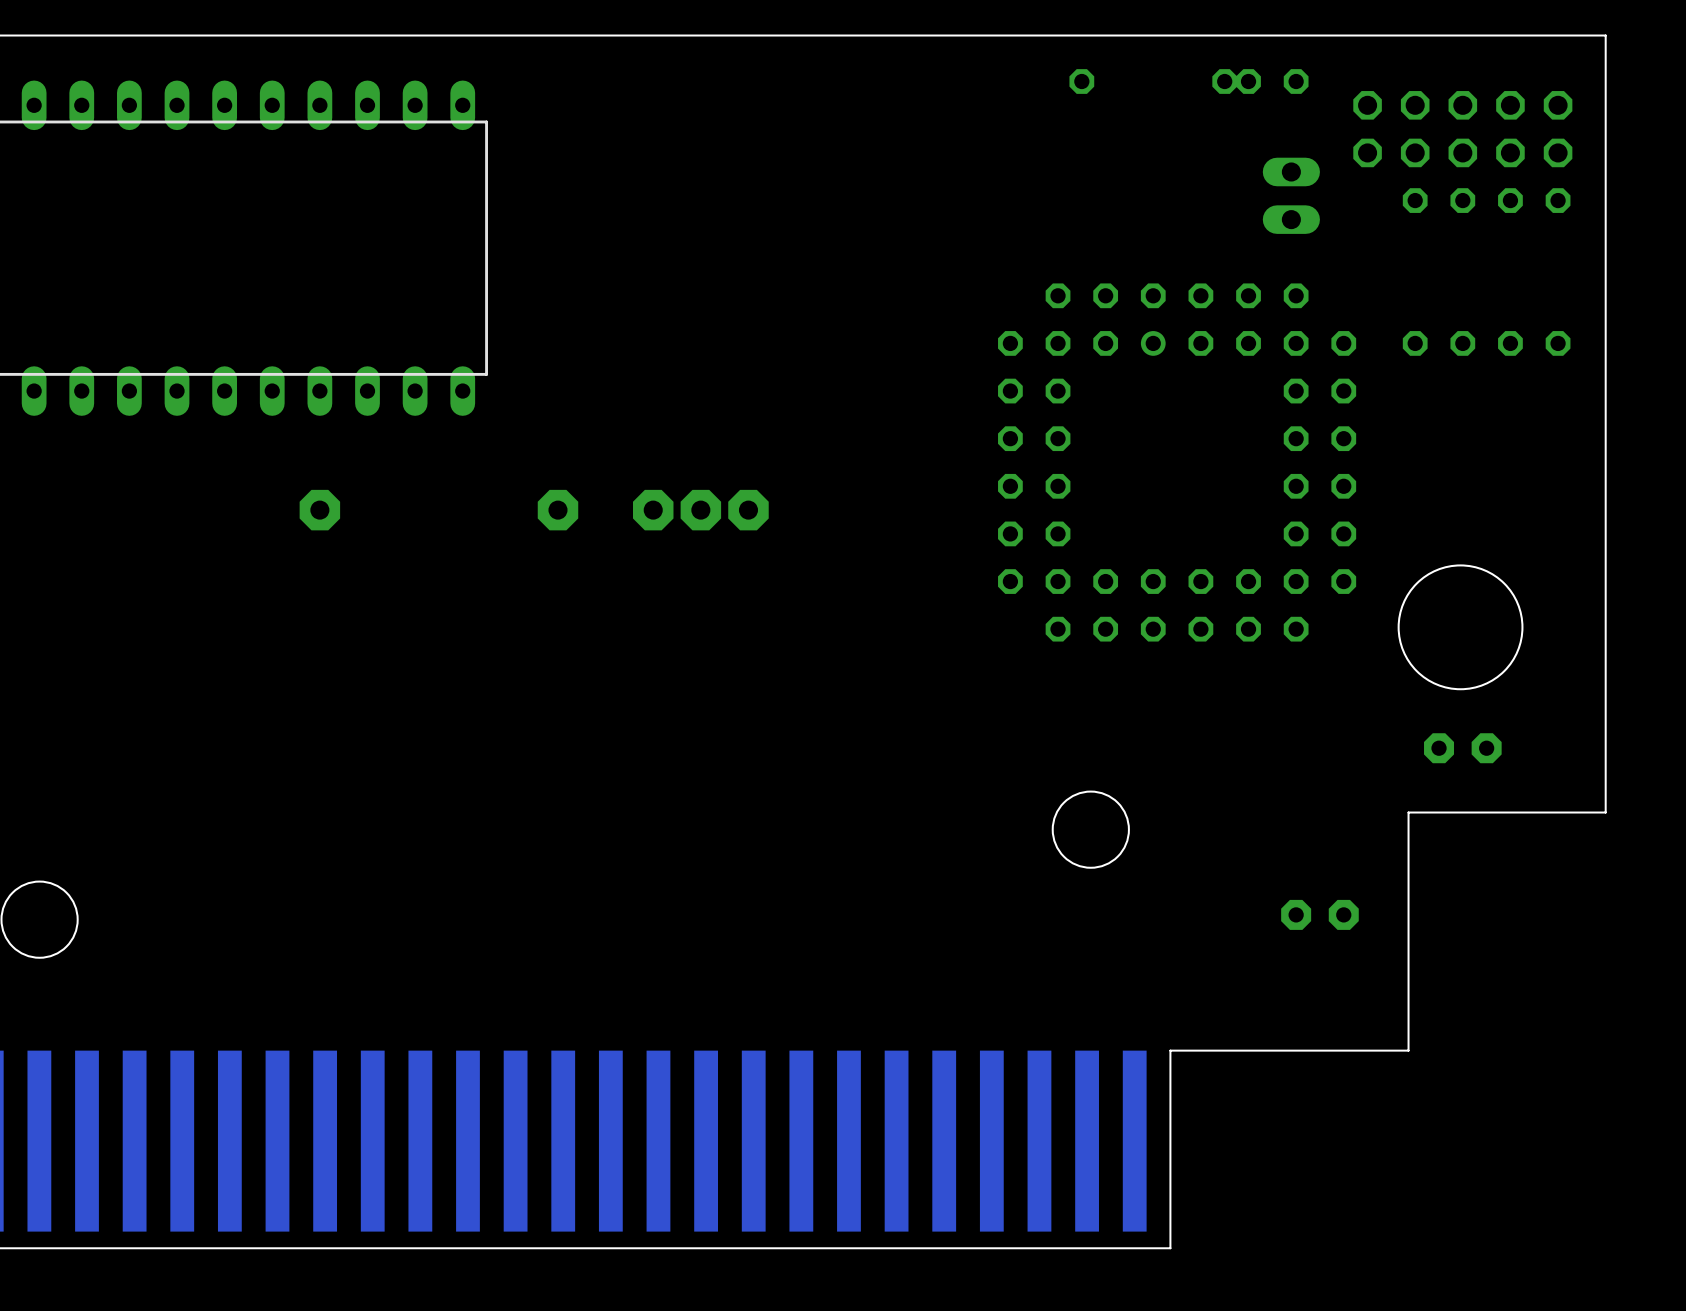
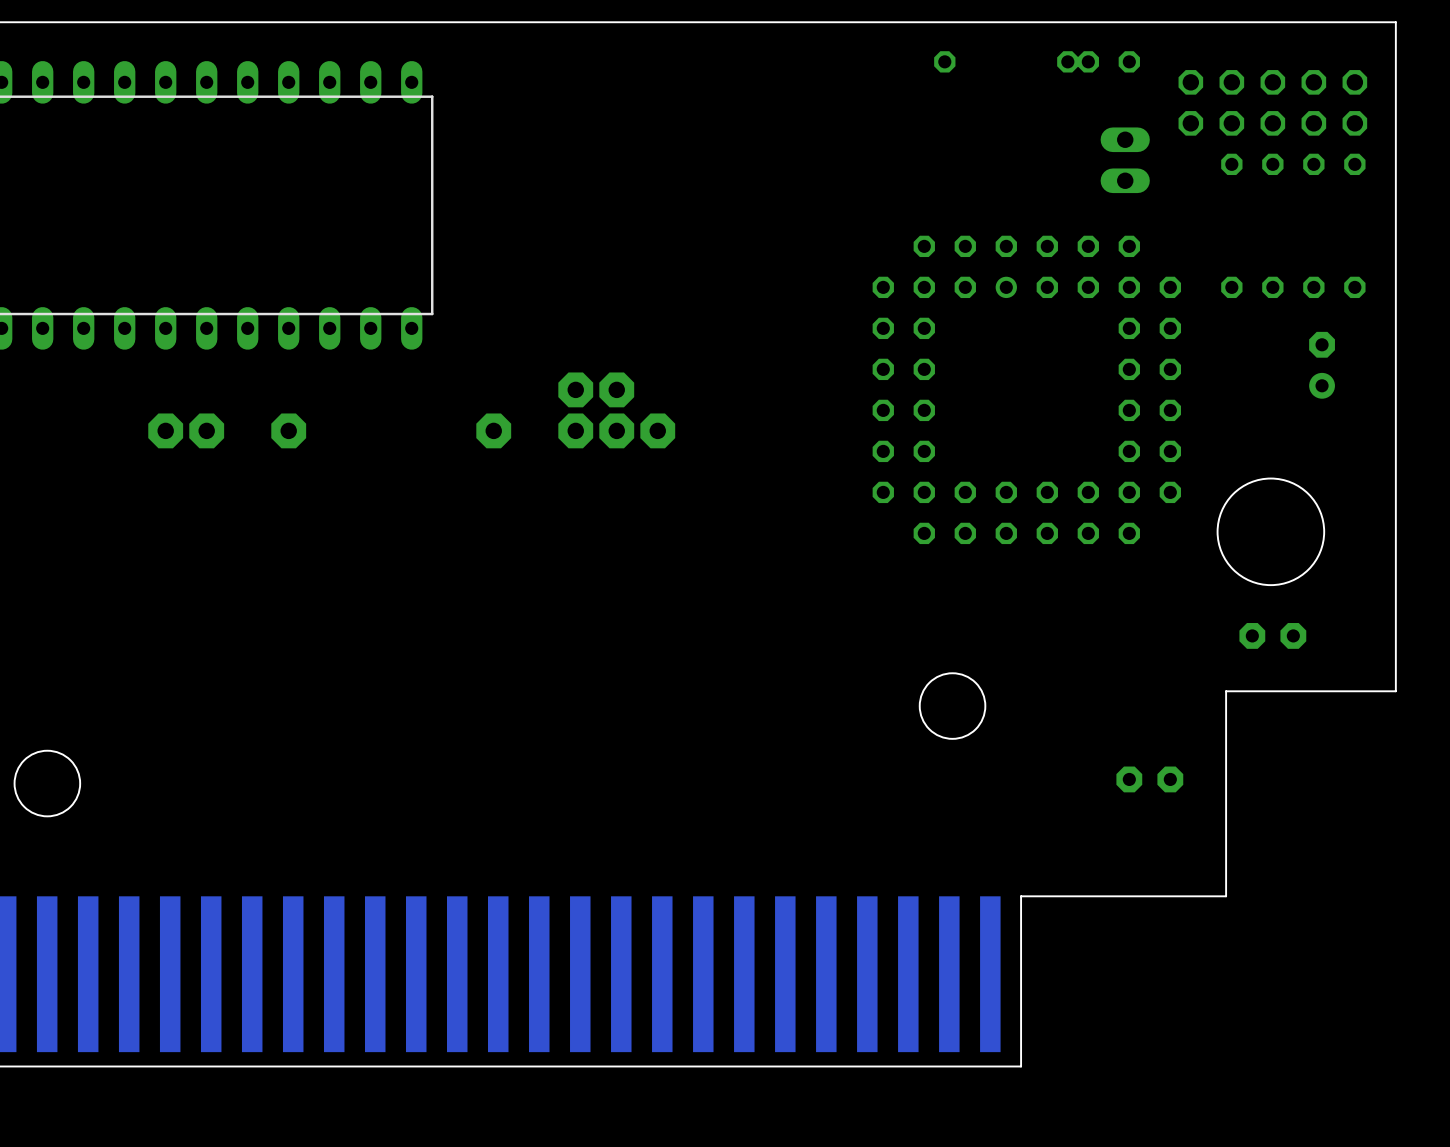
part: none -> (1322, 365)
part: none -> (575, 389)
part: none -> (616, 389)
part: none -> (165, 430)
part: none -> (206, 430)

